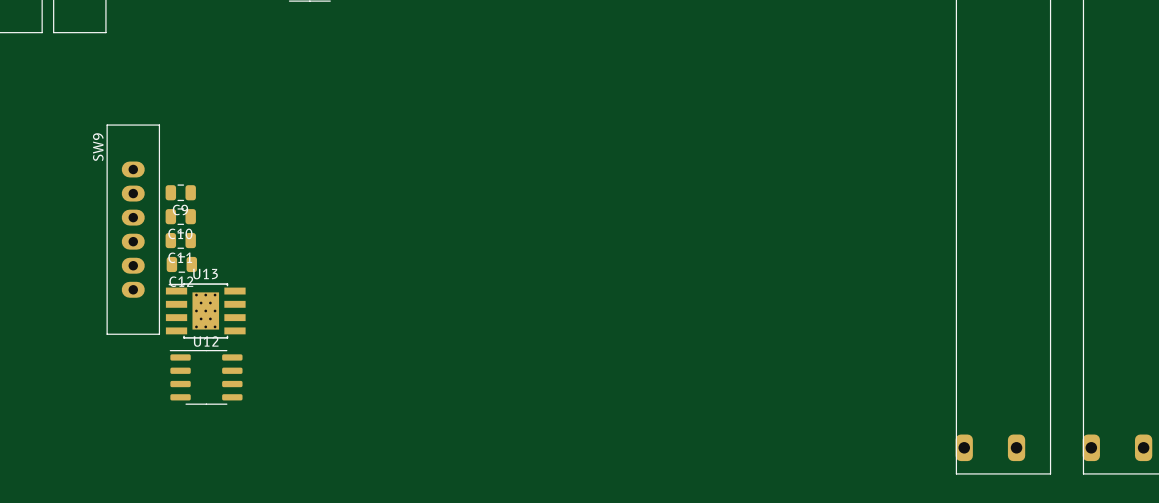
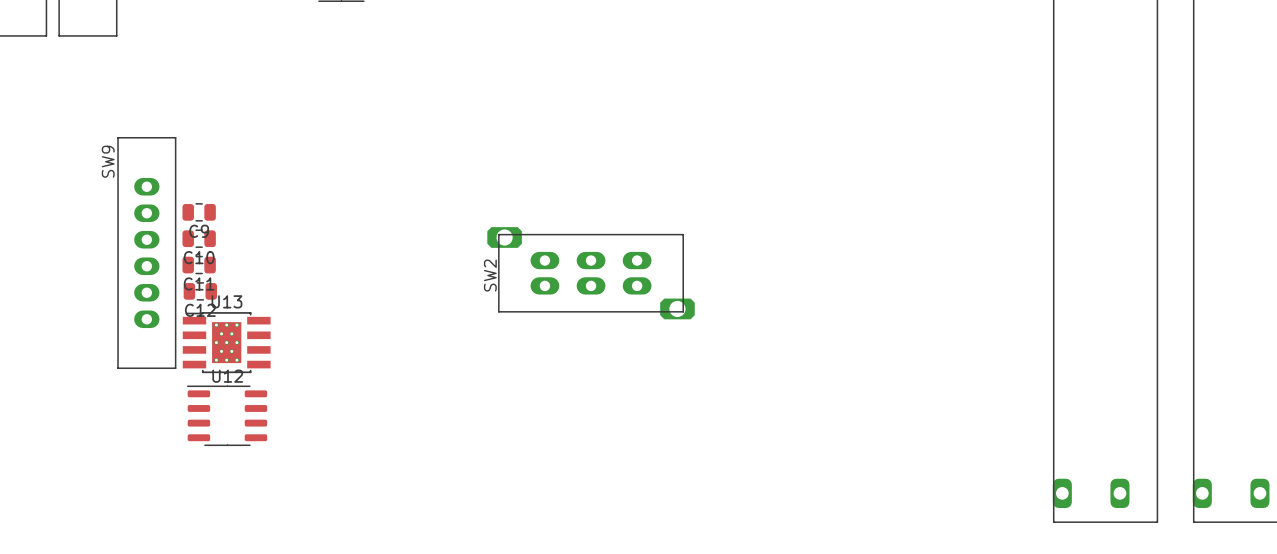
SW2: none -> (591, 273)

